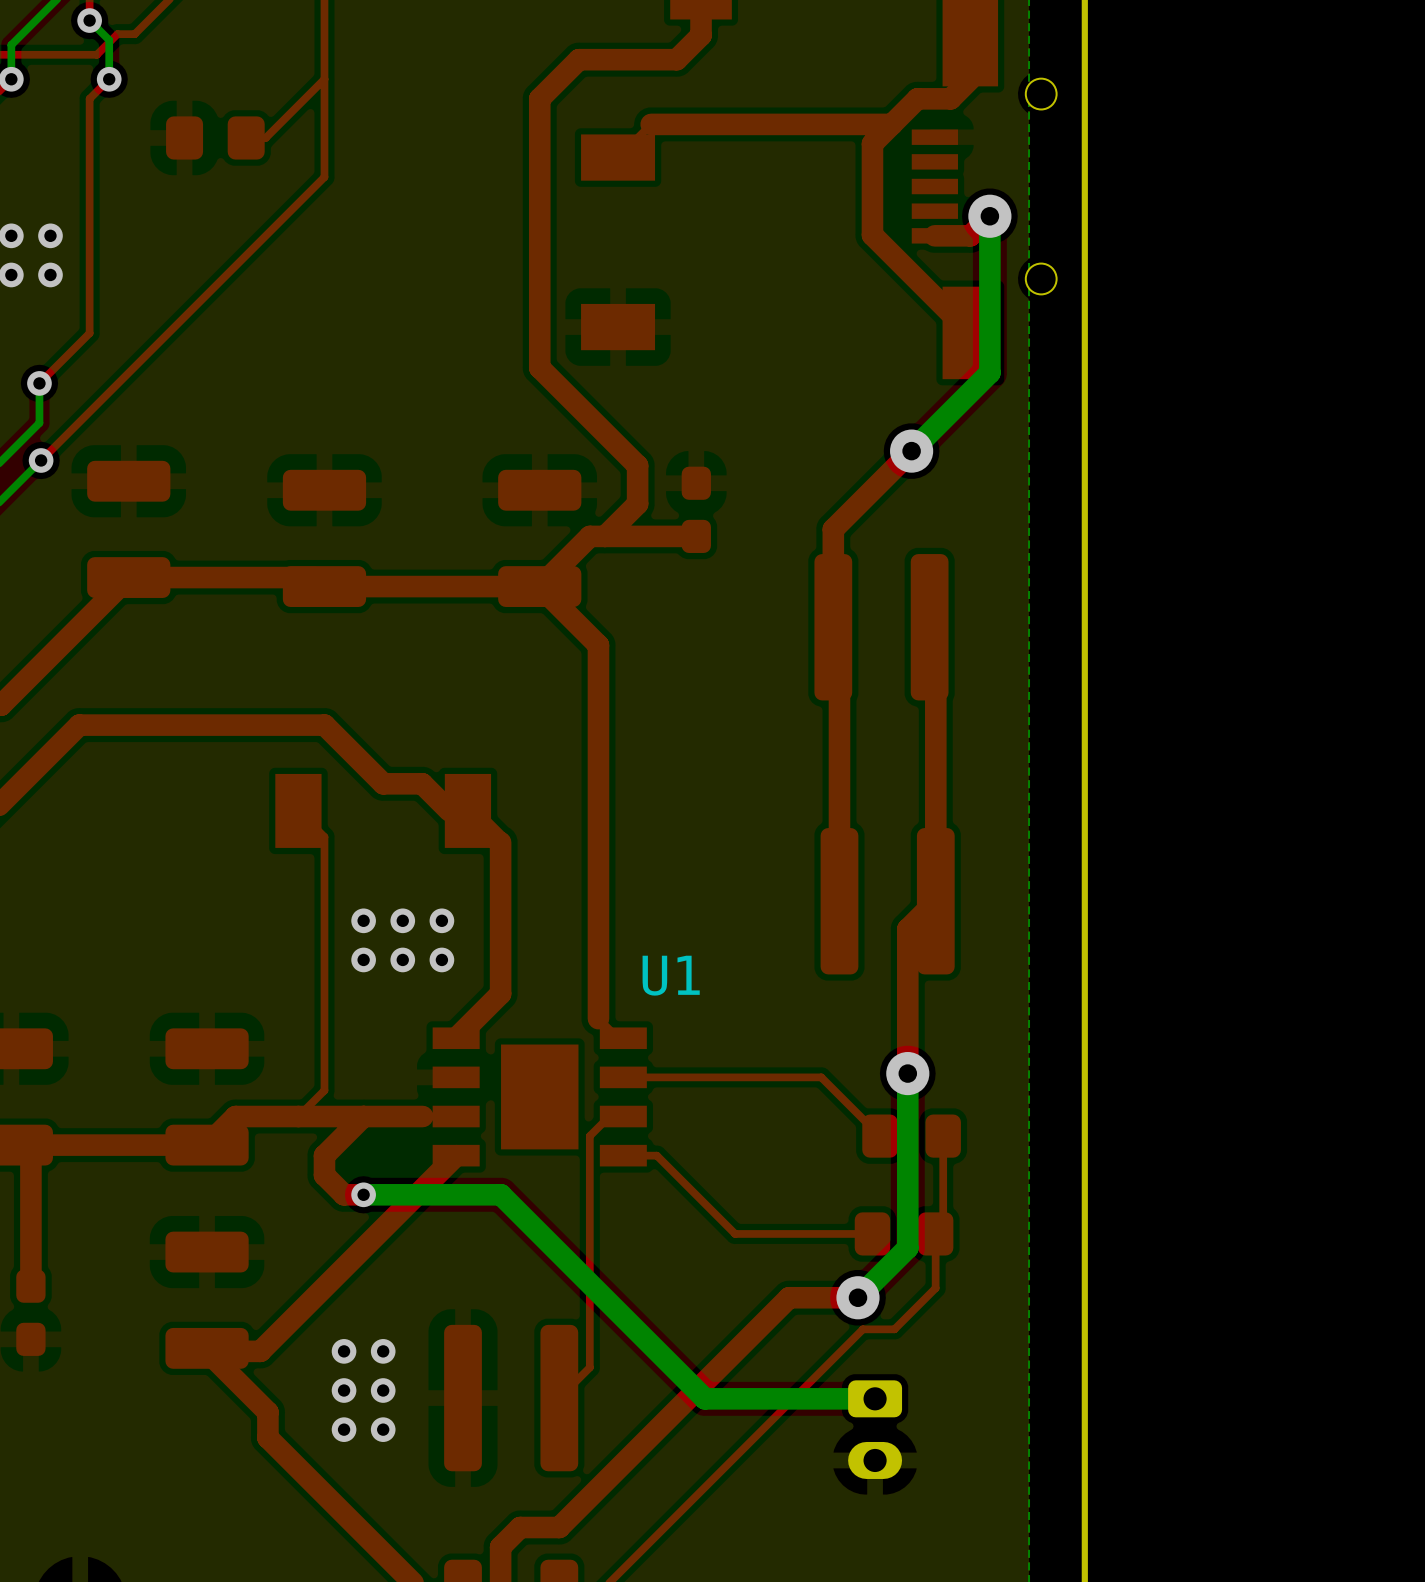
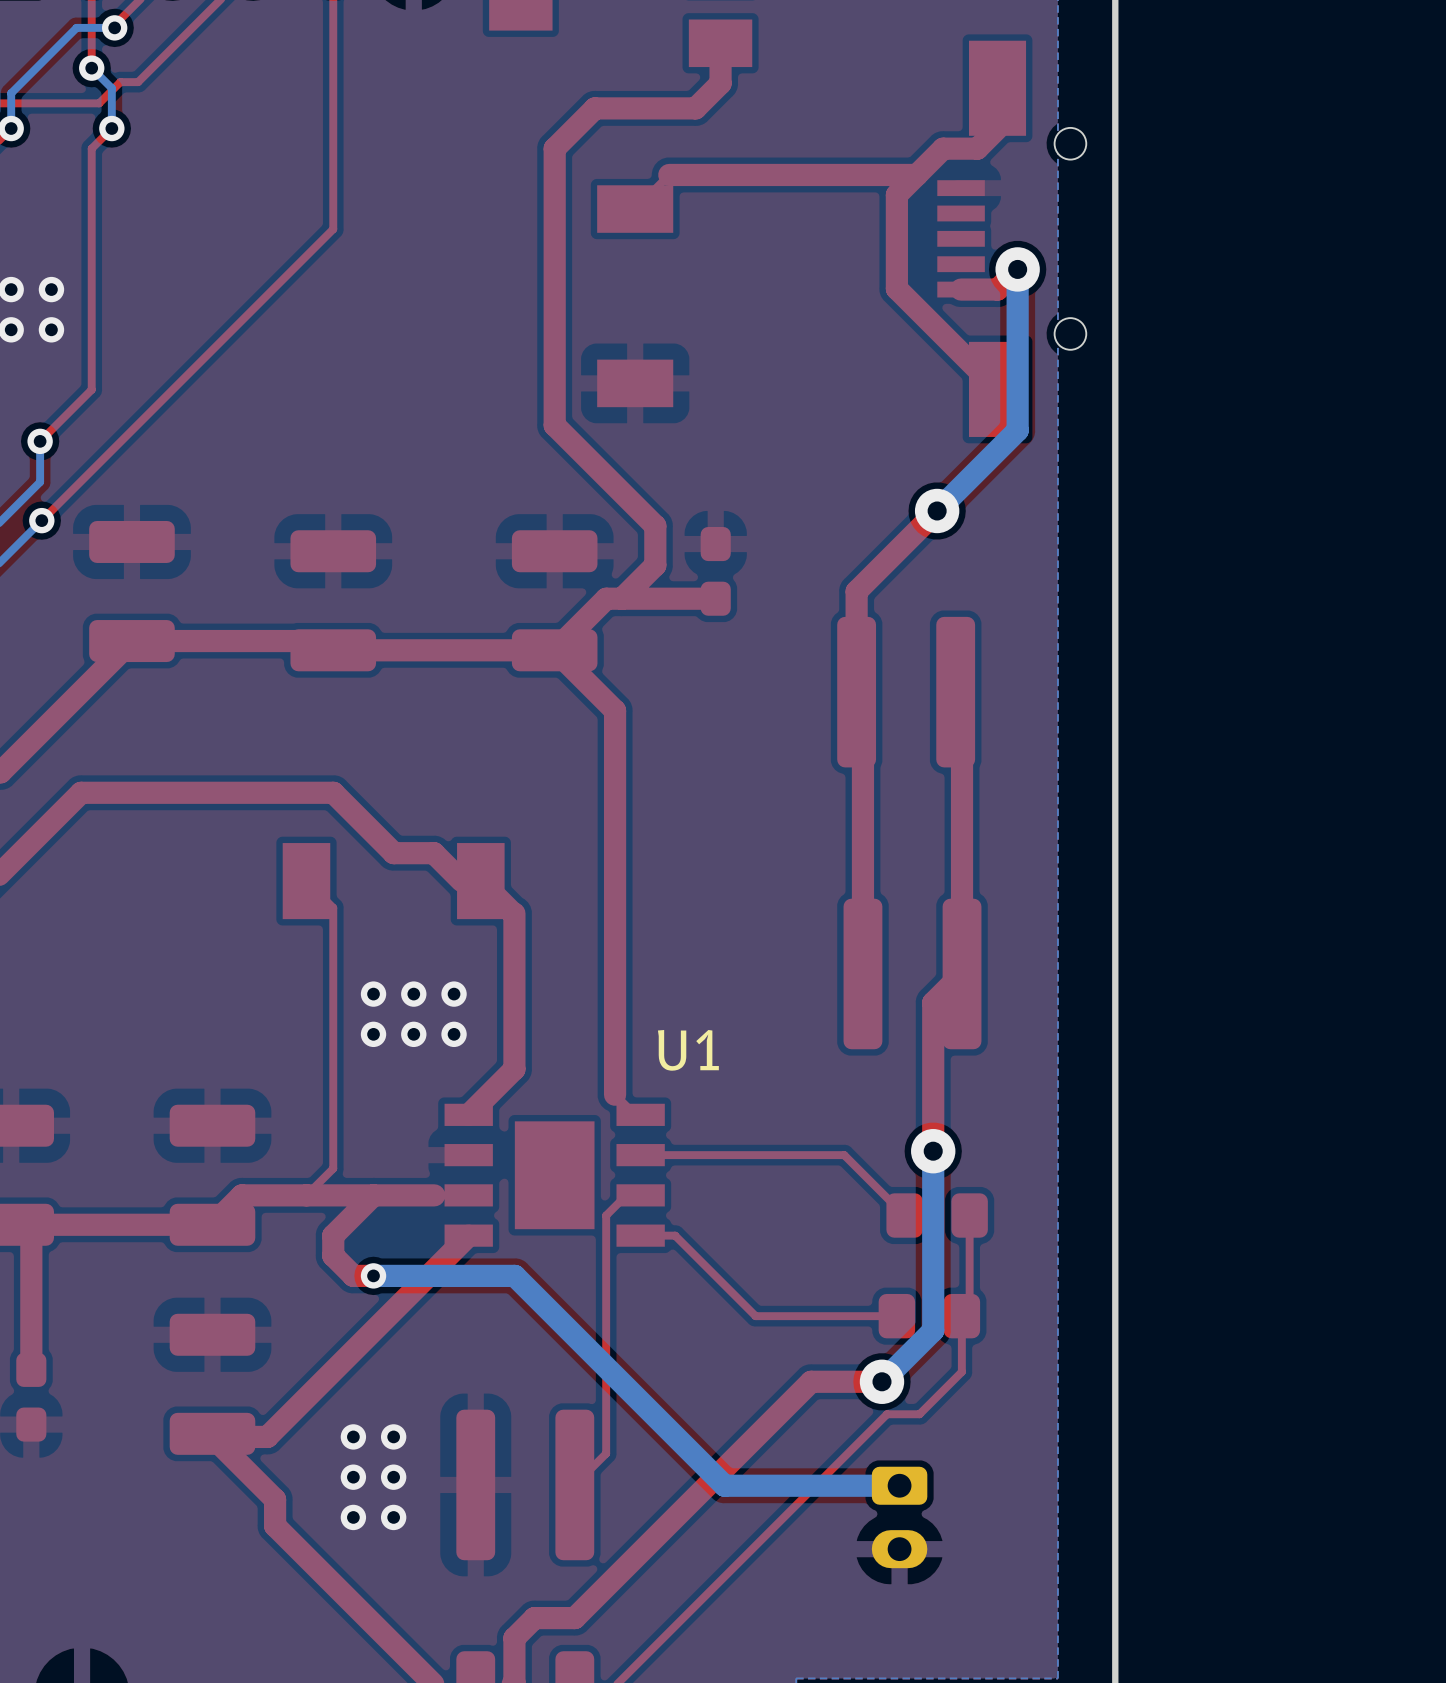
top track: (324, 79) (265, 137) (246, 137) -> none
part: (215, 137) -> none

